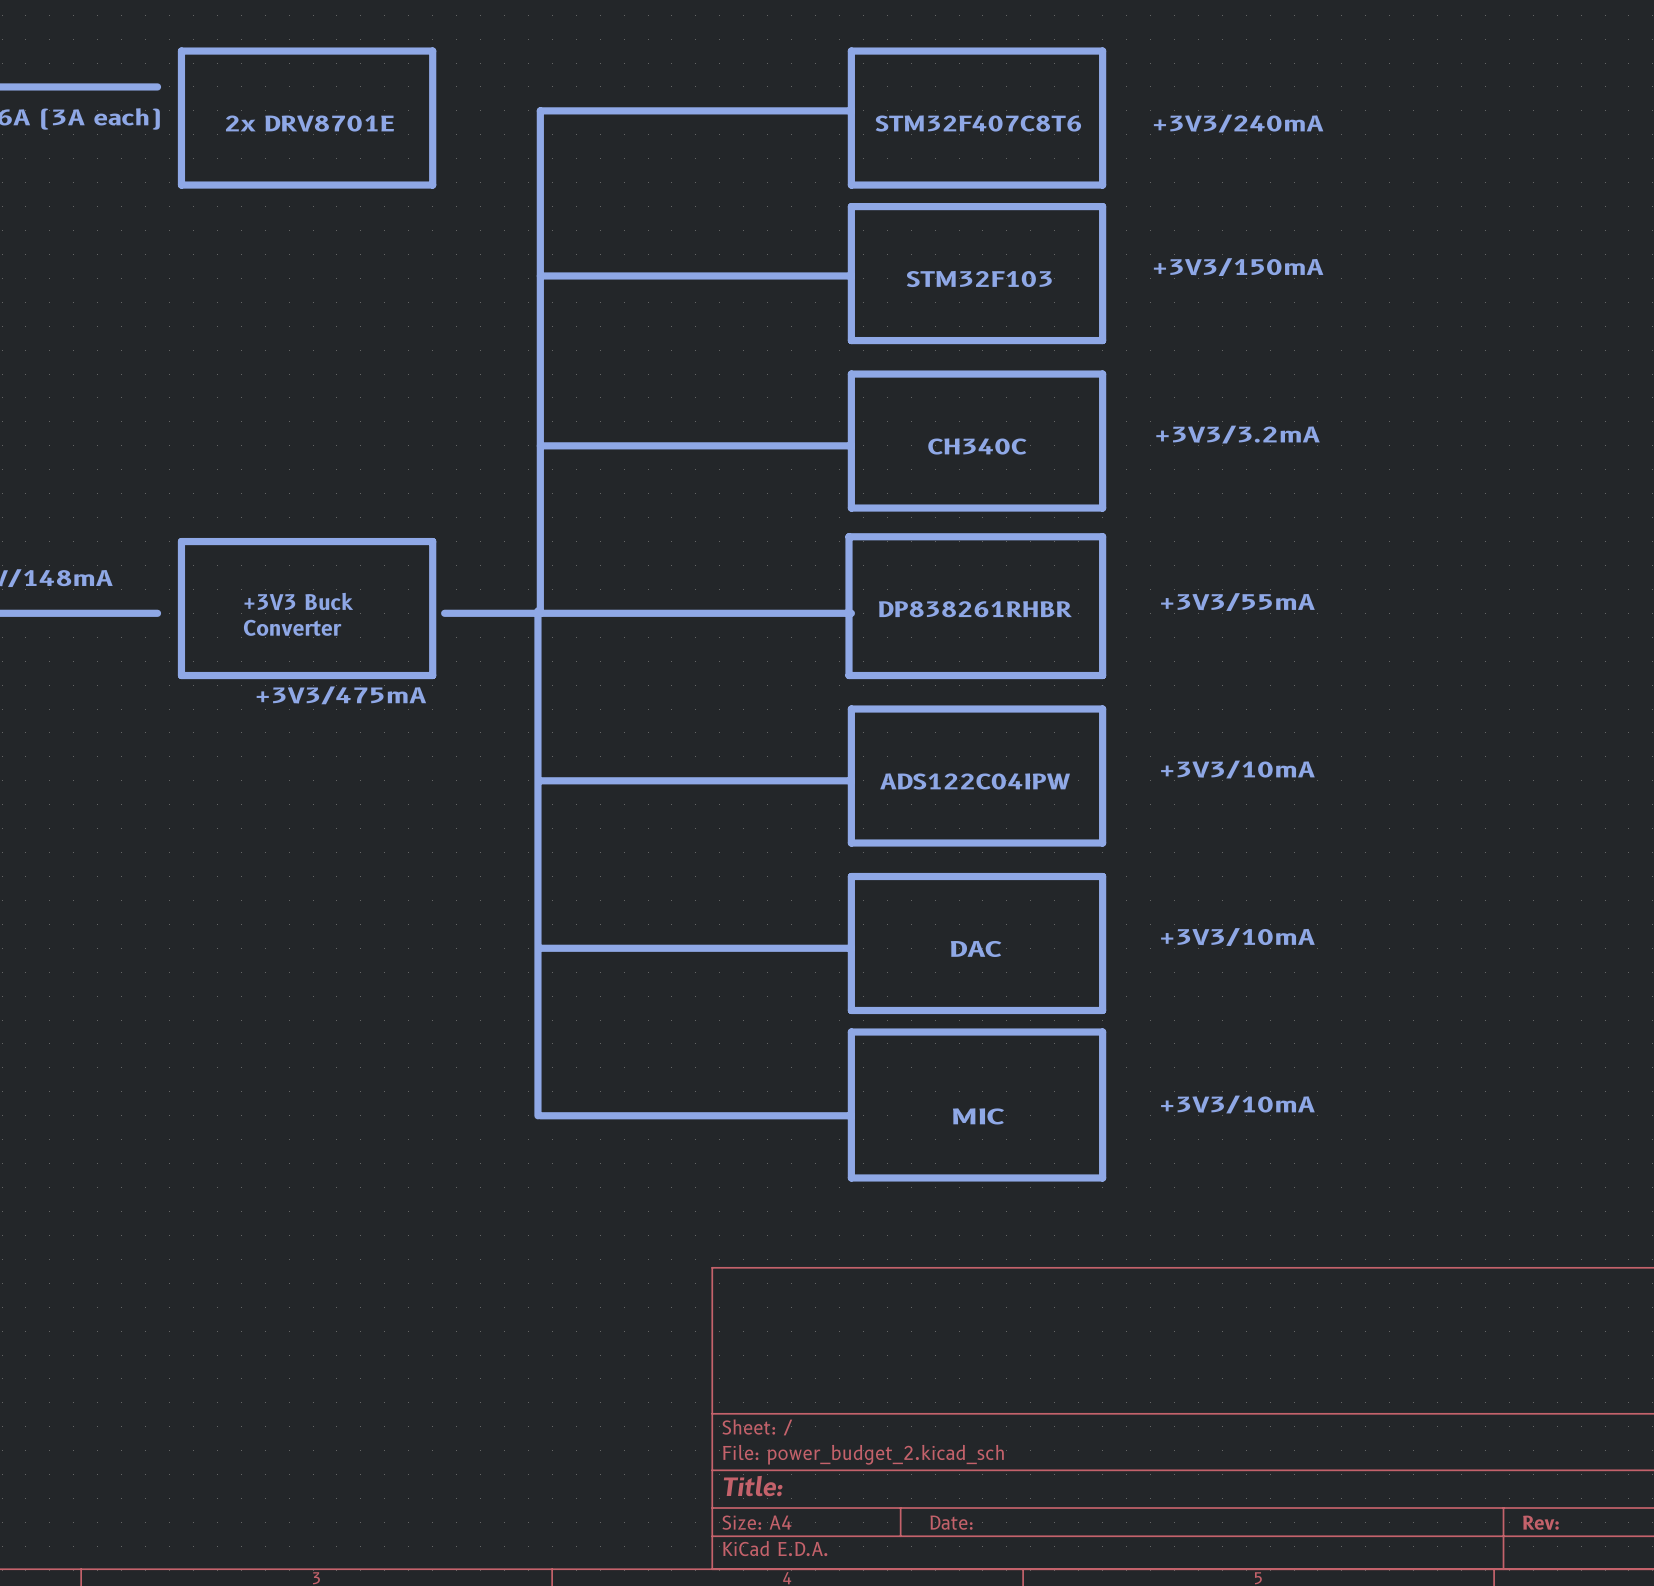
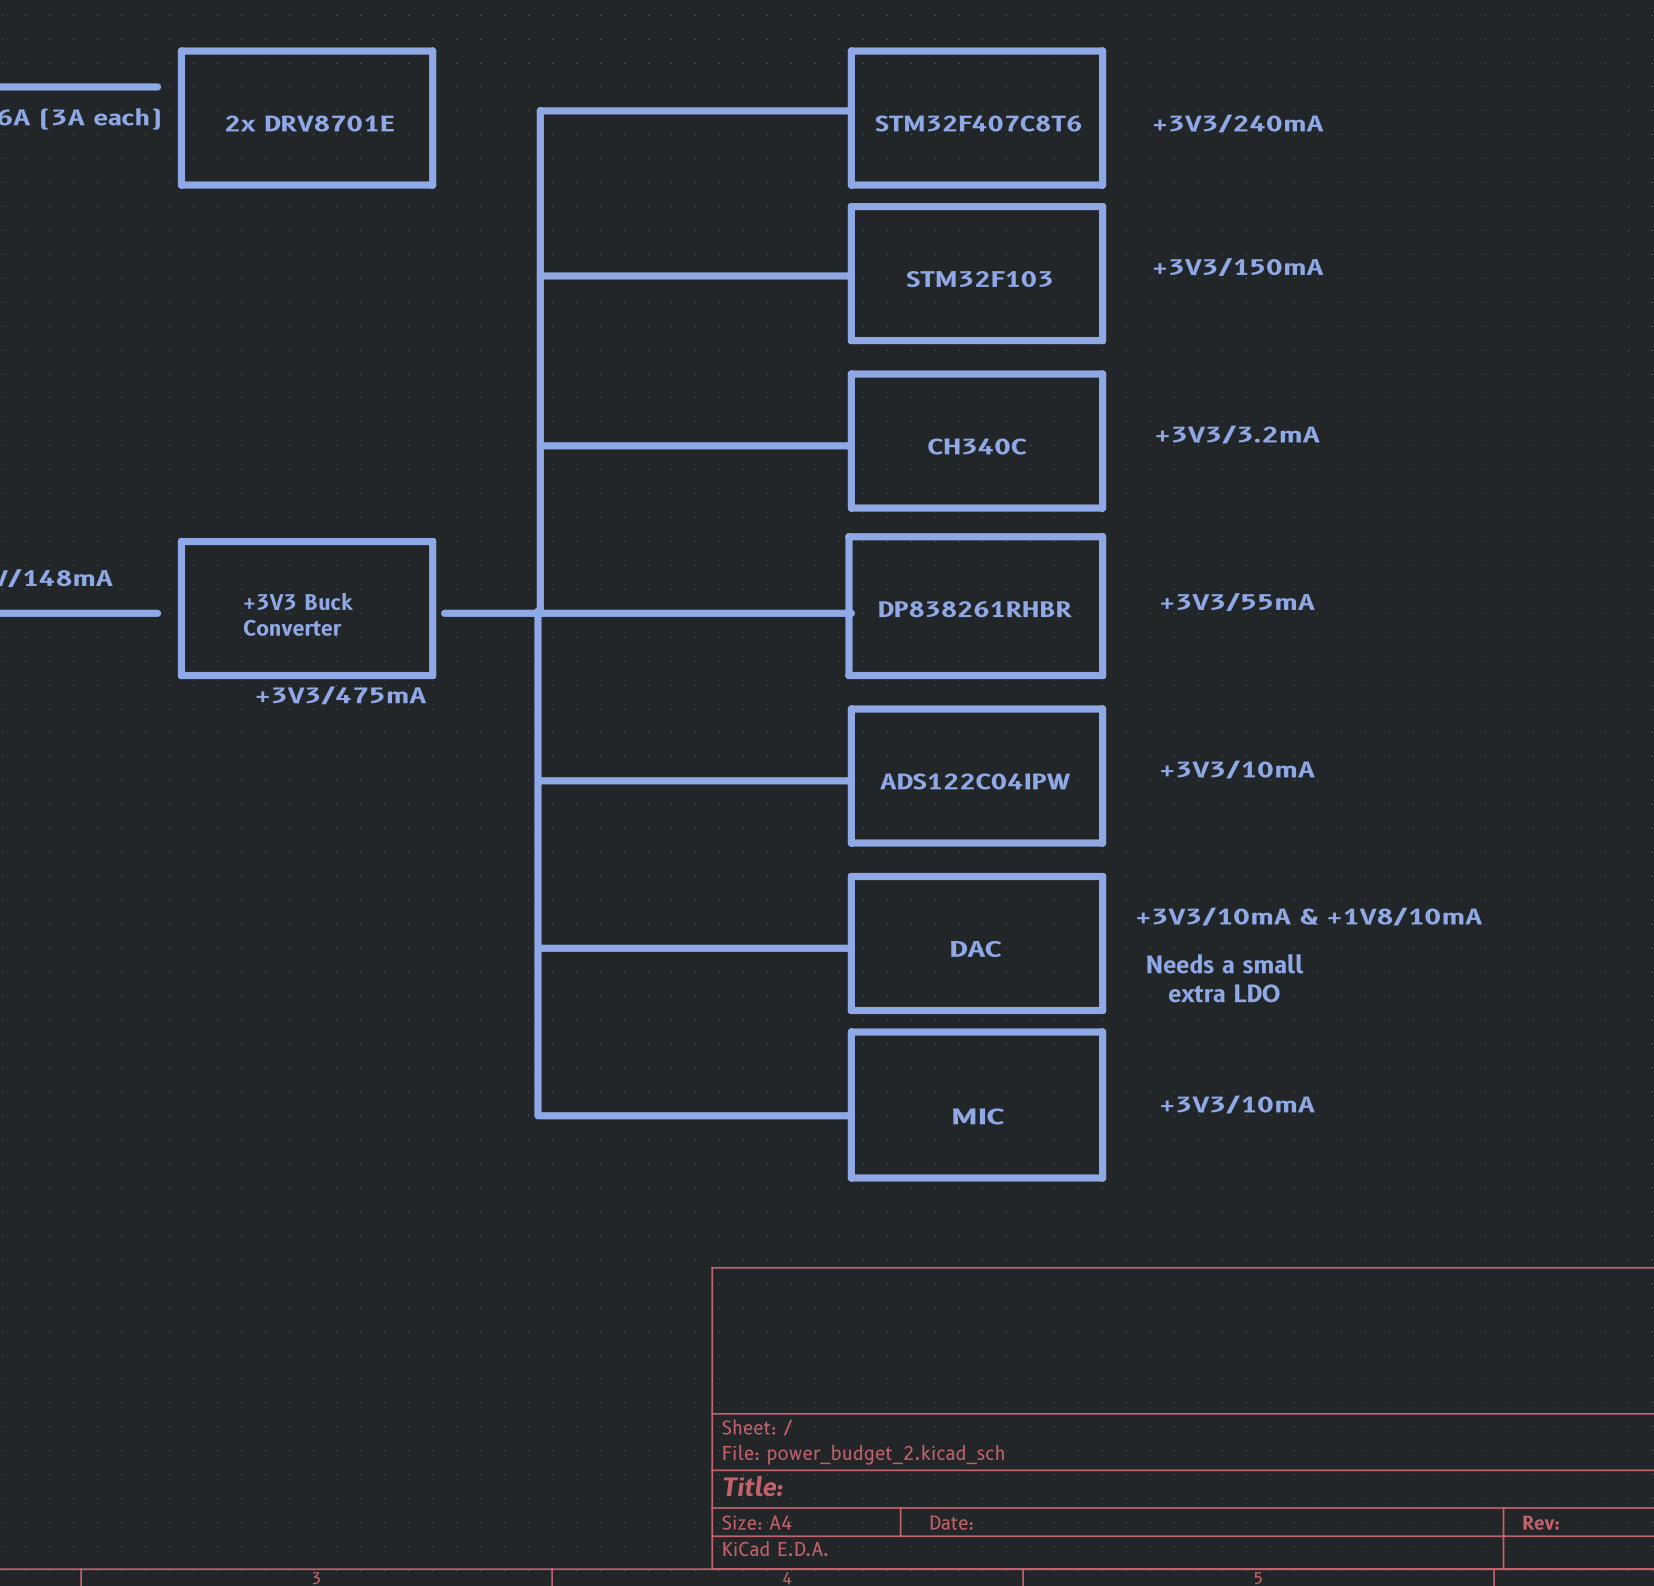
text: none -> +3V3/10mA & +1V8/10mA (1309, 916)
text: +3V3/10mA (1237, 937) -> none
text: none -> Needs a small (1225, 963)
text: none -> extra LDO (1224, 993)

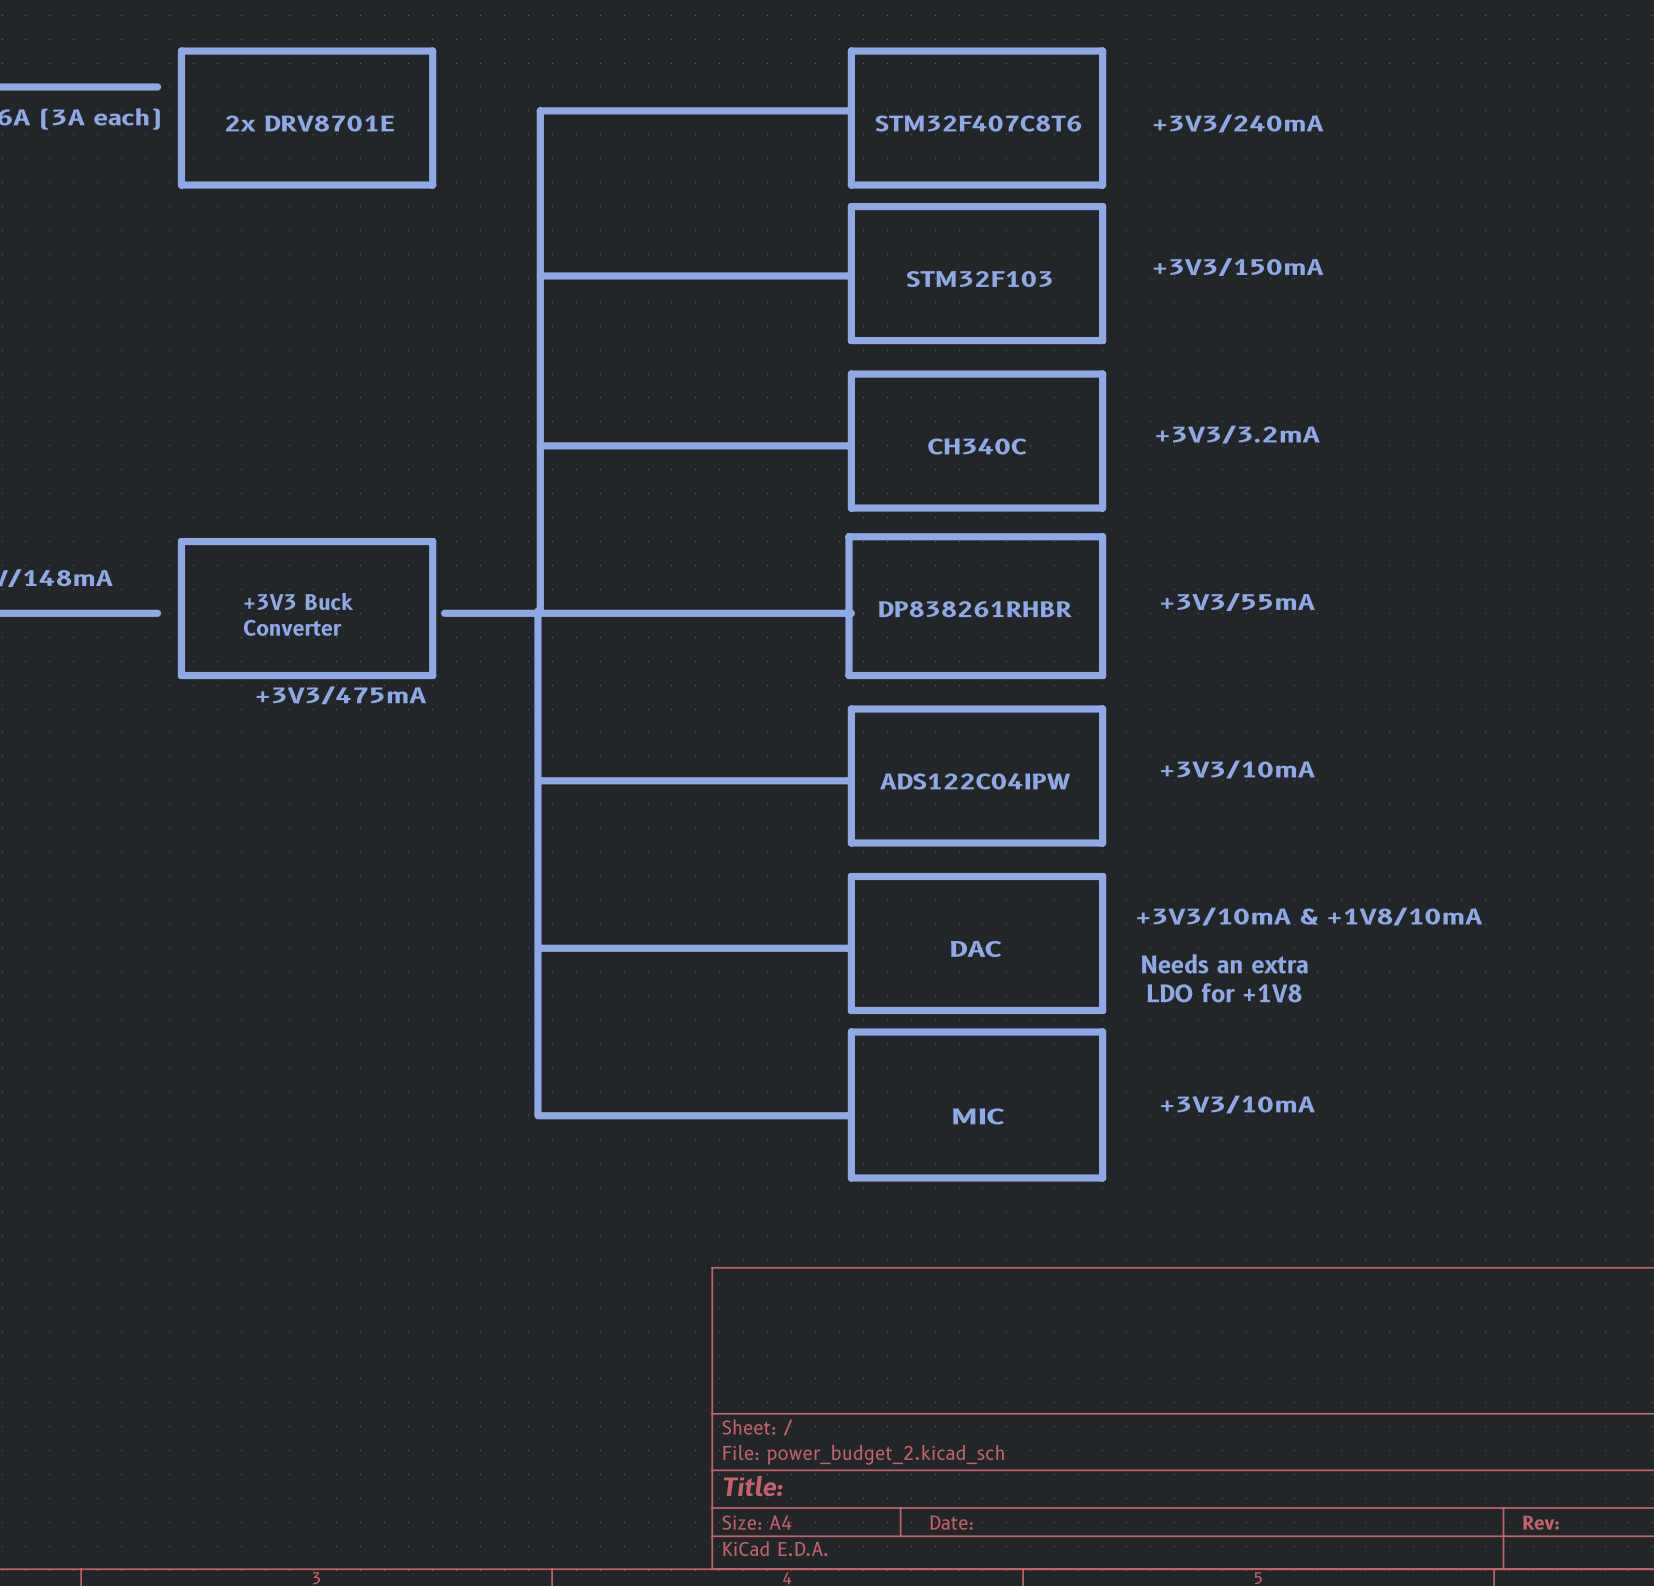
text: Needs a small (1225, 963) -> Needs an extra (1224, 963)
text: extra LDO (1224, 993) -> LDO for +1V8 (1224, 992)

